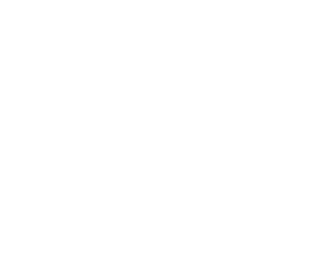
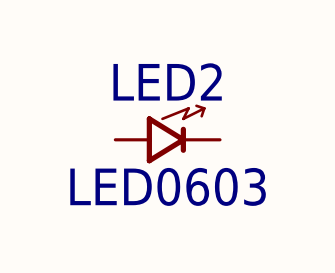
LED2: none -> LED0603 (167, 133)

